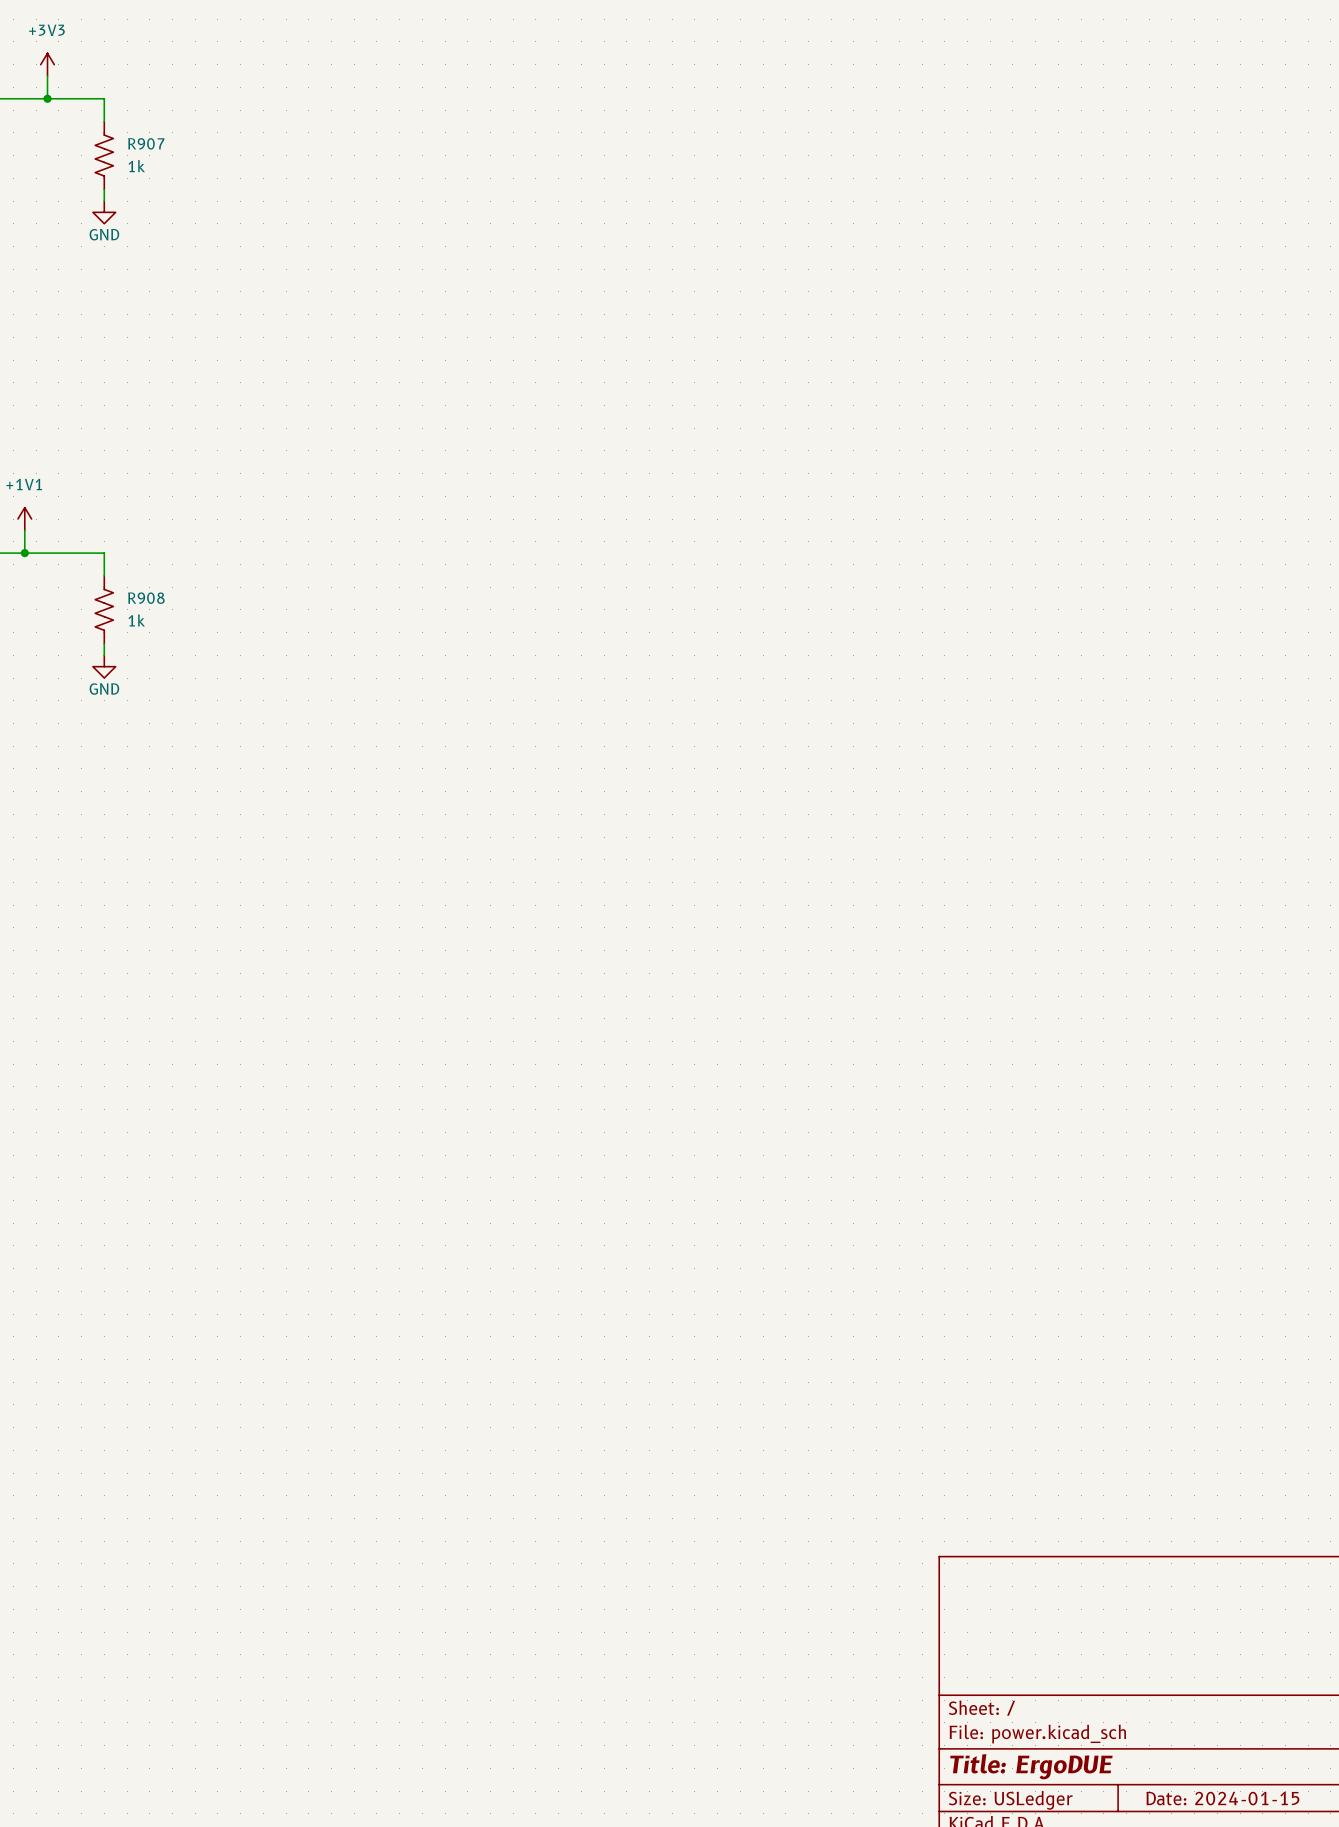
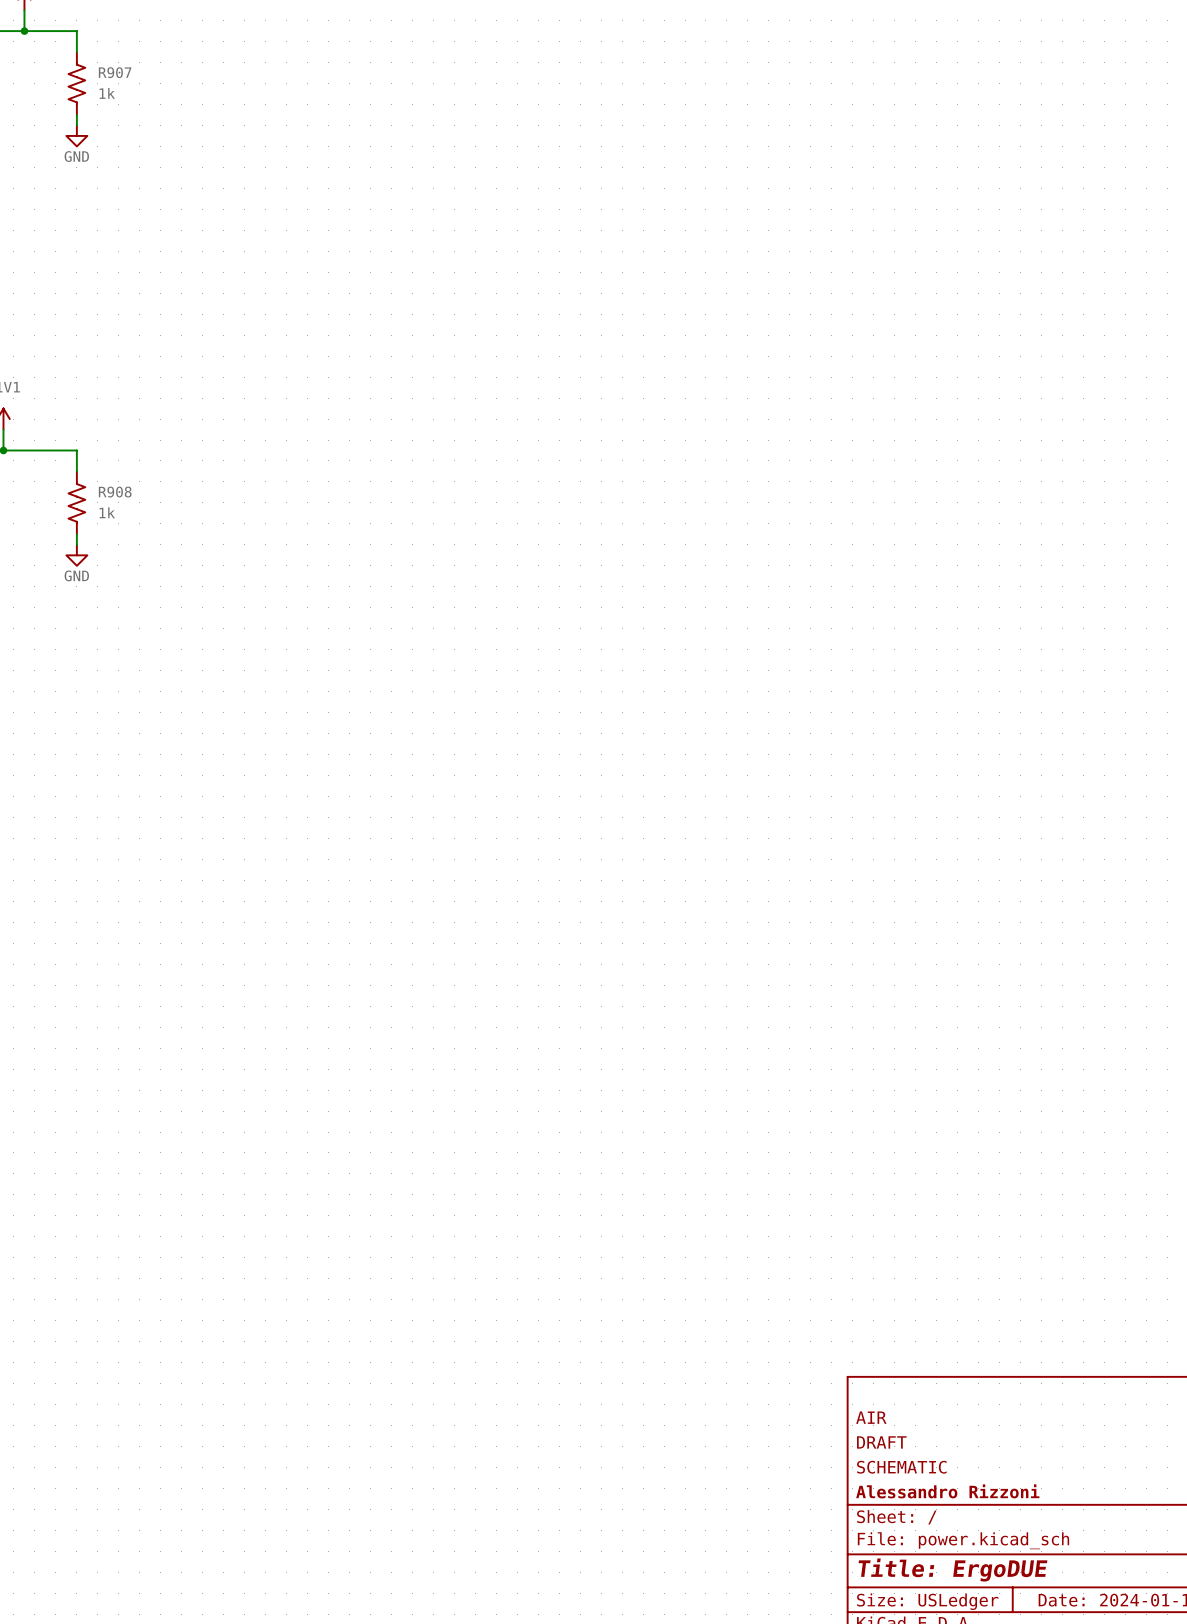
title block: none -> AIR (871, 1417)
title block: none -> DRAFT (881, 1442)
title block: none -> SCHEMATIC (901, 1467)
title block: none -> Alessandro Rizzoni (947, 1491)

